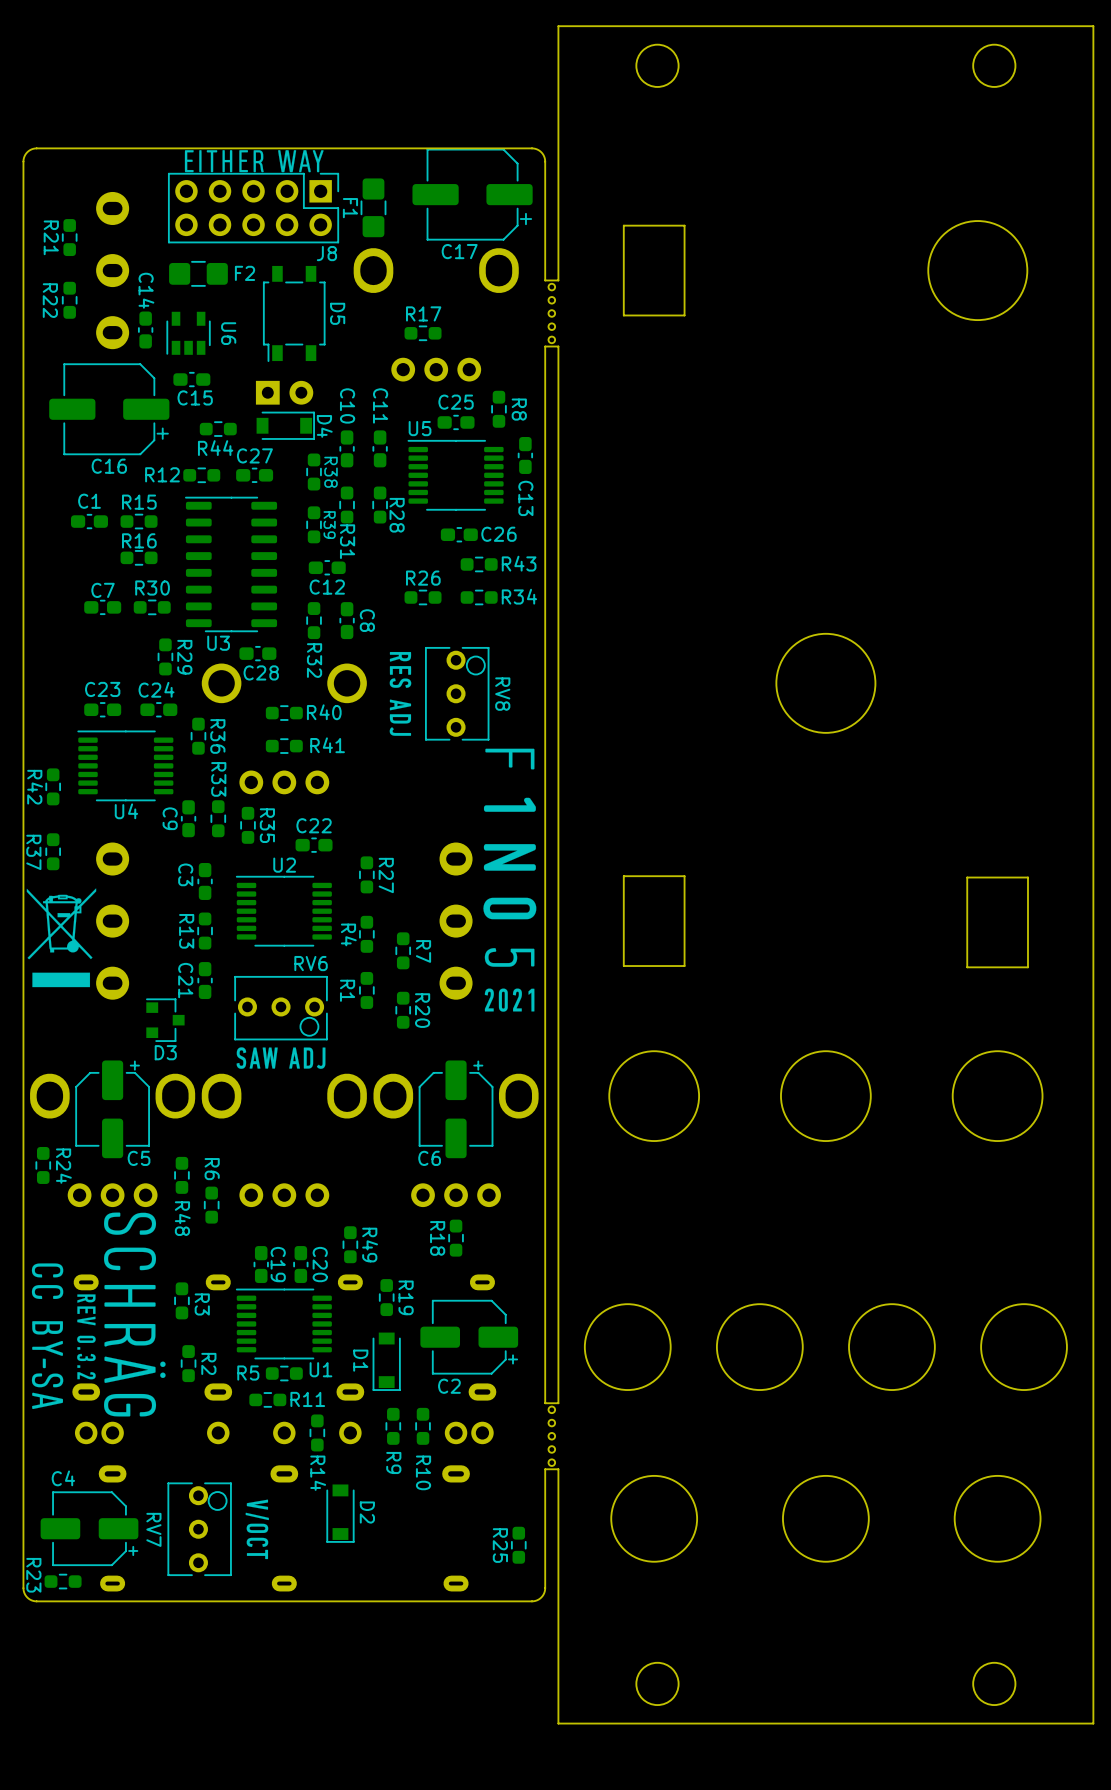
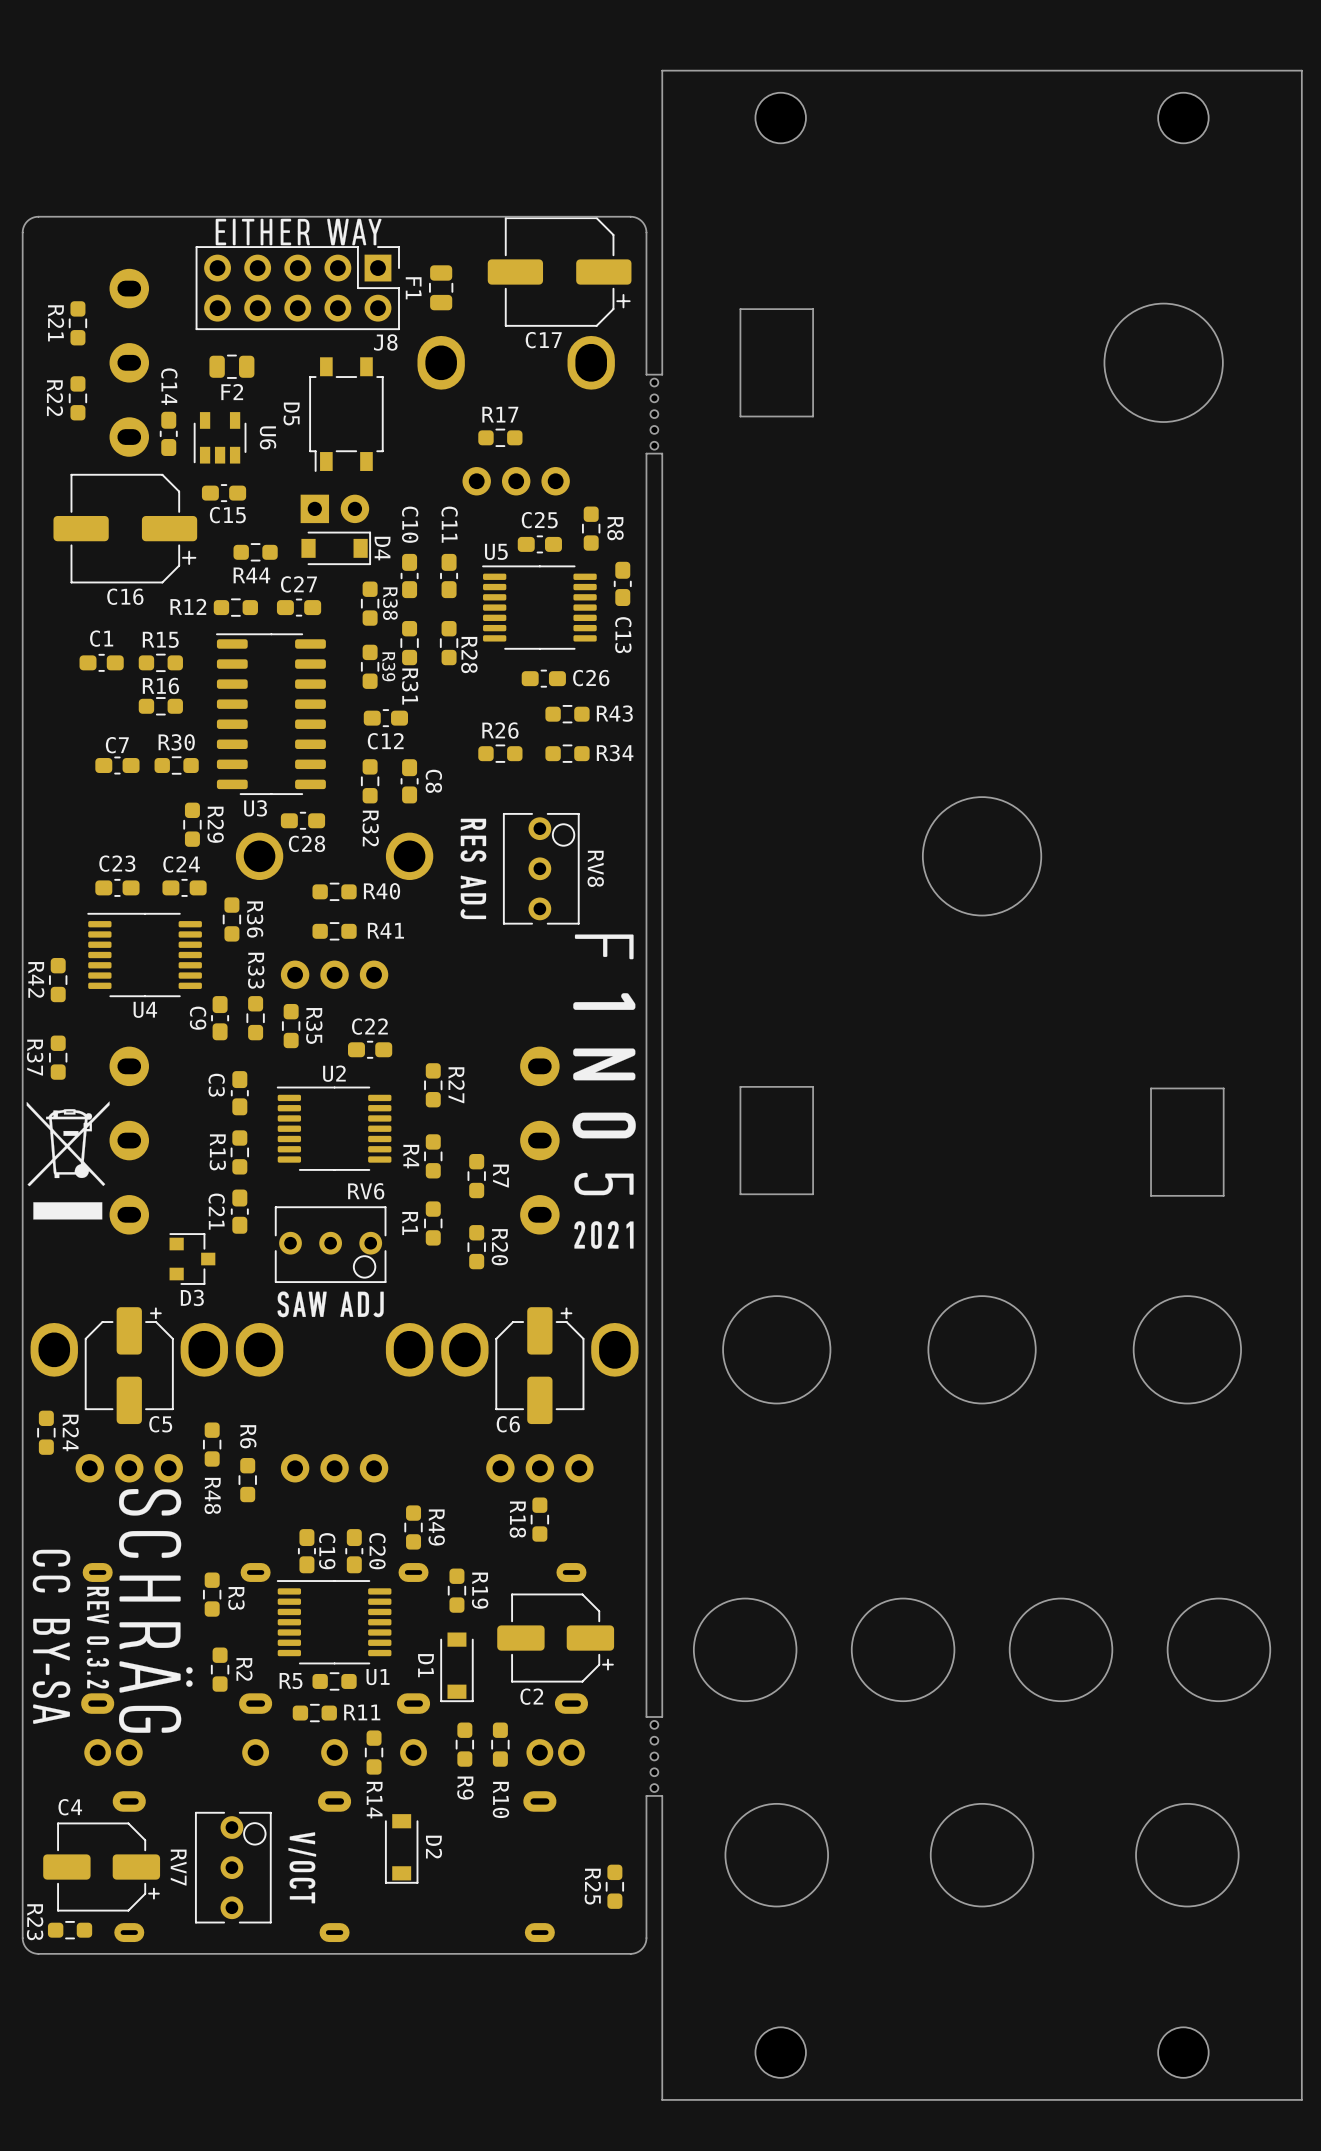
F1 footprint: [360, 178, 387, 238] -> [429, 265, 454, 311]
F2 footprint: [169, 261, 228, 287] -> [209, 354, 255, 379]
F2 name position: F2 (245, 273) -> F2 (232, 392)
D5 name position: D5 (337, 313) -> D5 (291, 413)

